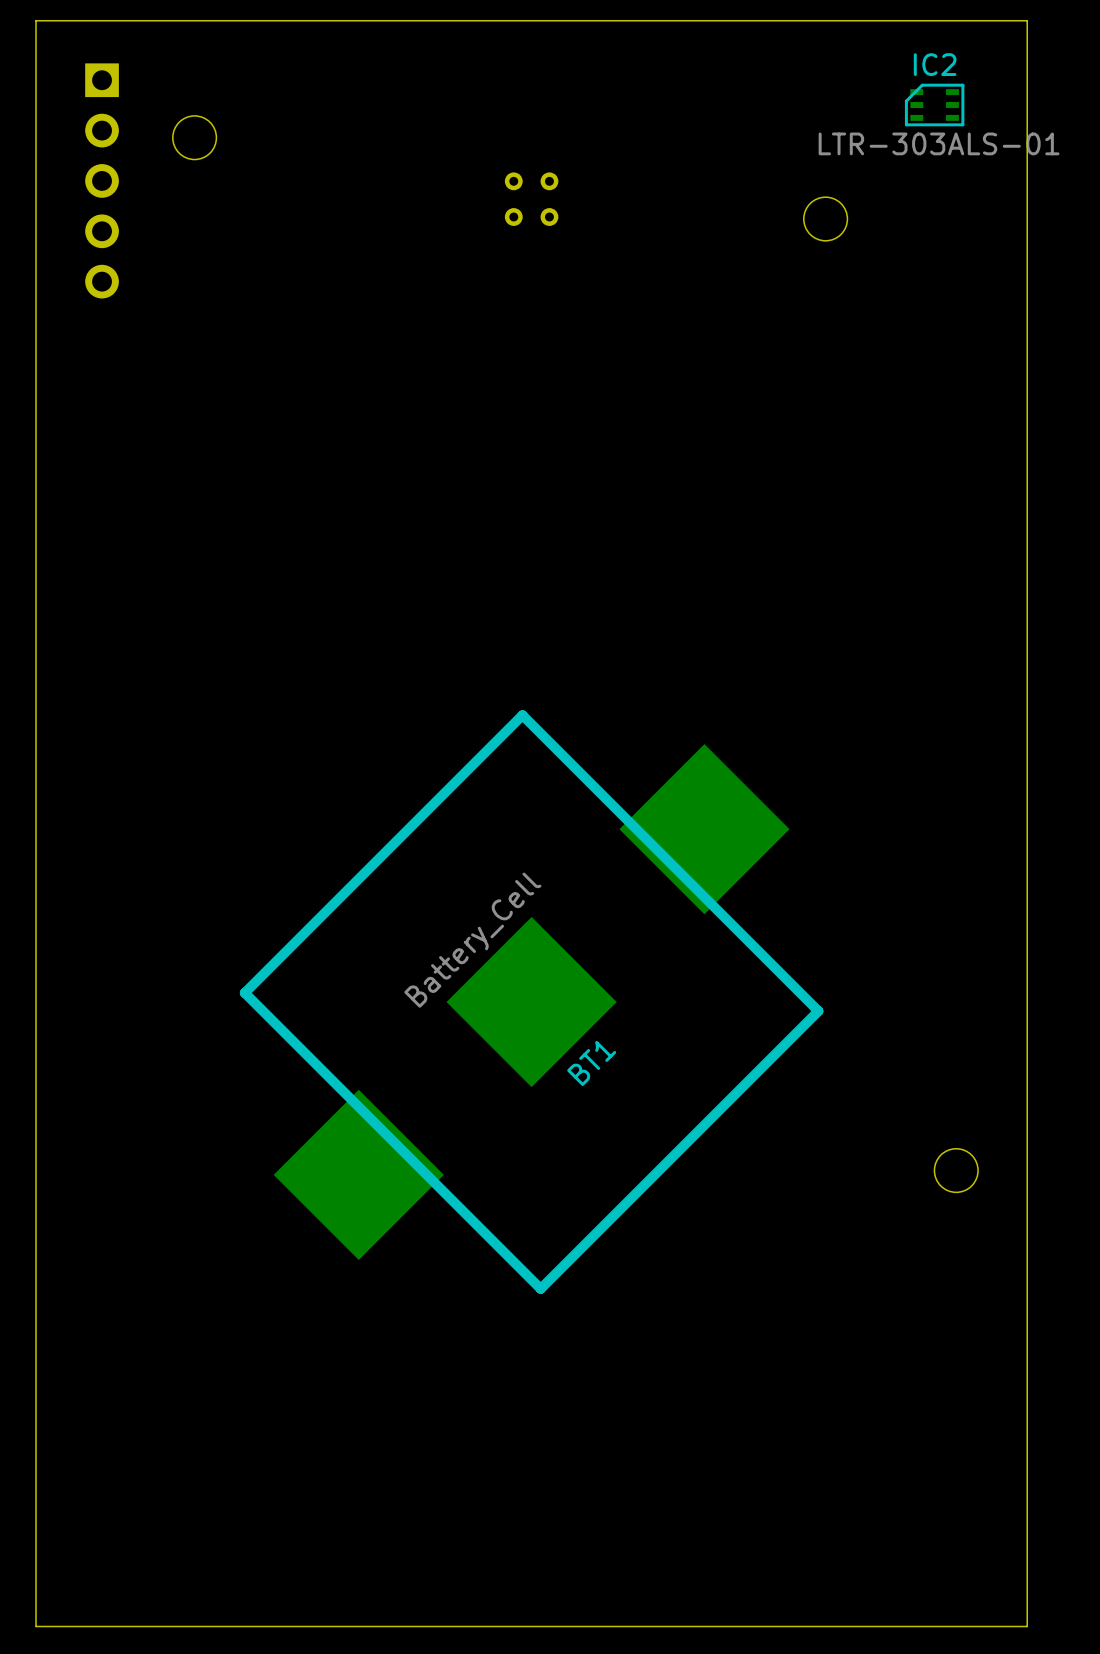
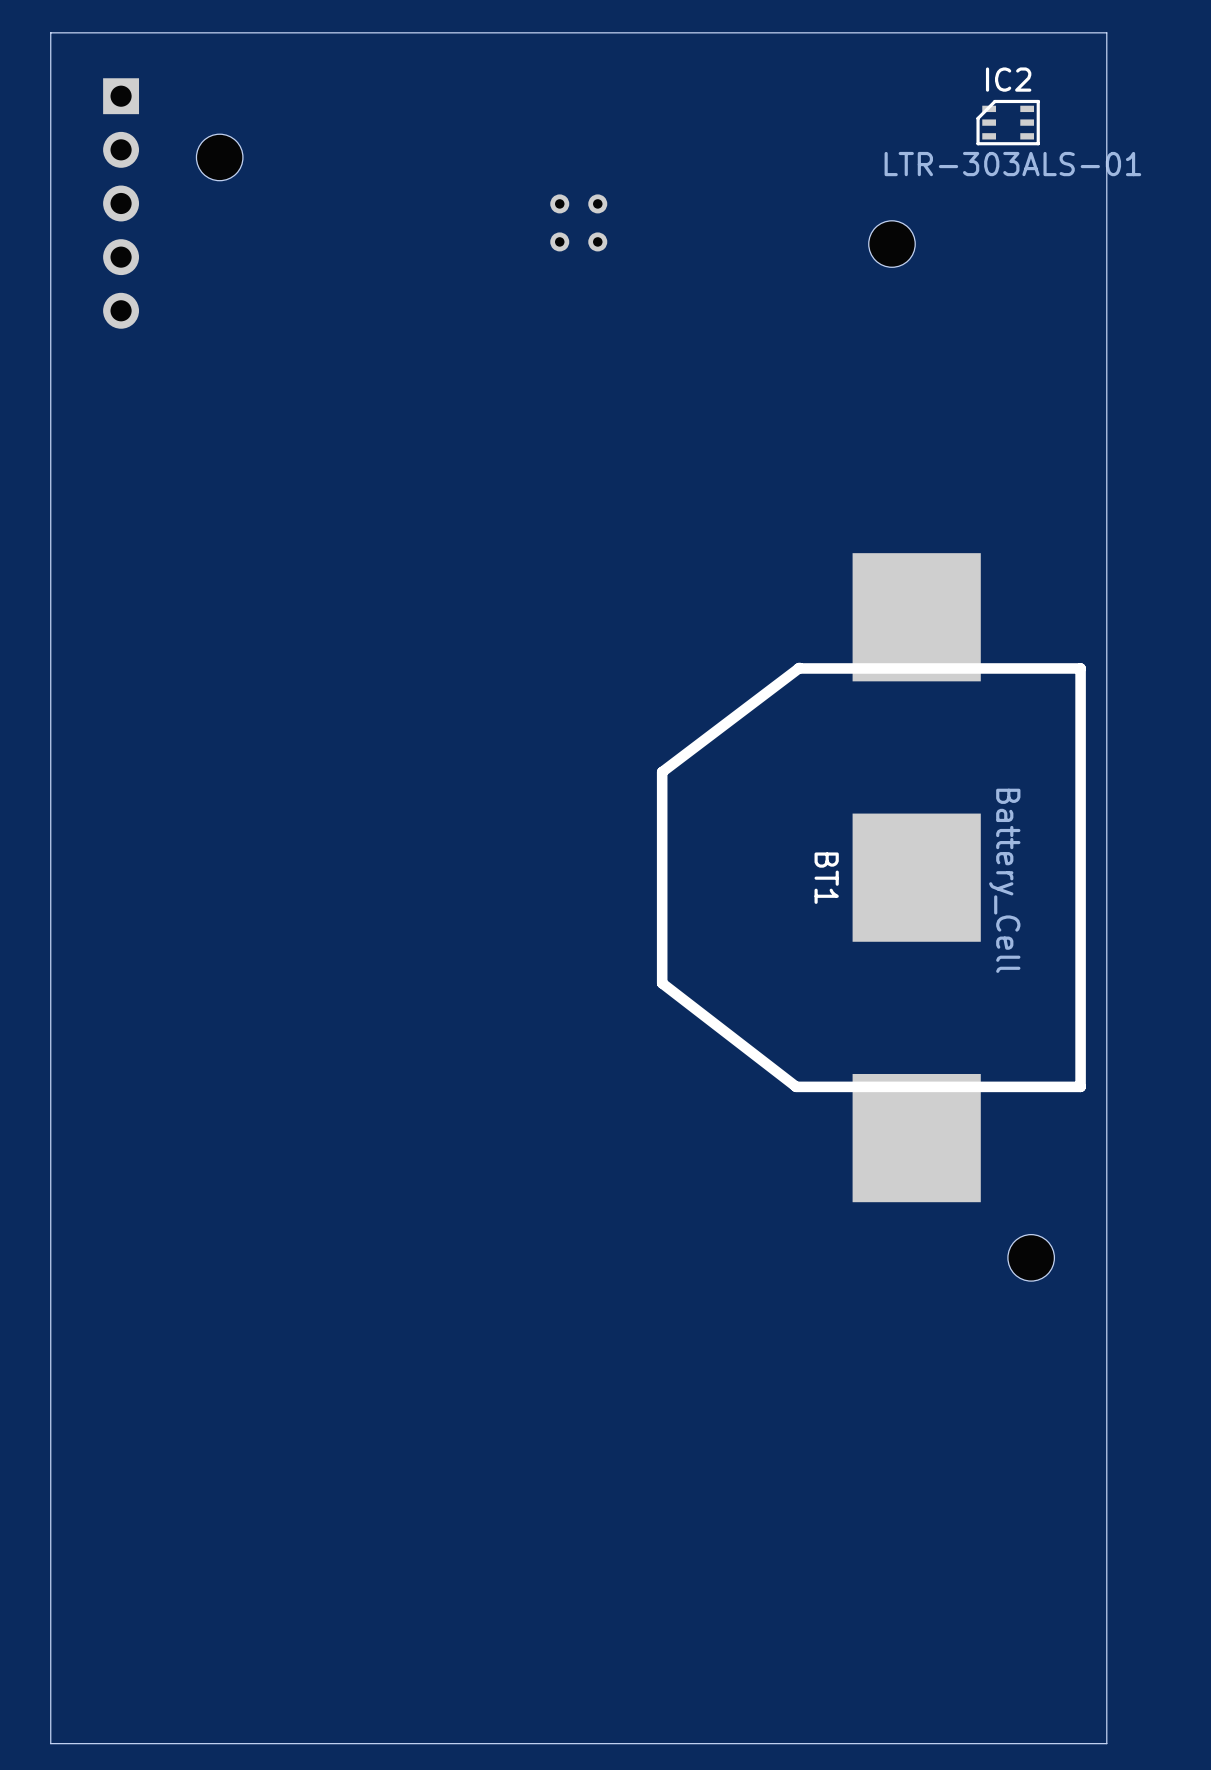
BT1 footprint: [239, 710, 824, 1294] -> [656, 553, 1086, 1203]
BT1 value position: Battery_Cell (472, 940) -> Battery_Cell (1004, 880)
BT1 name position: BT1 (591, 1063) -> BT1 (826, 878)

